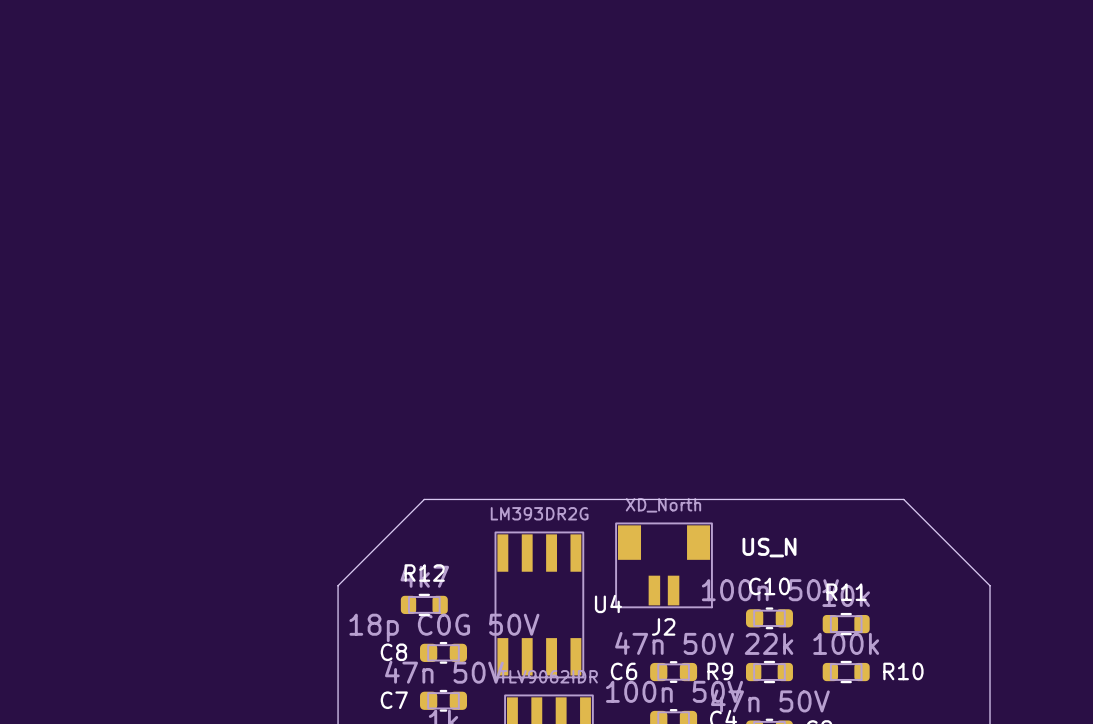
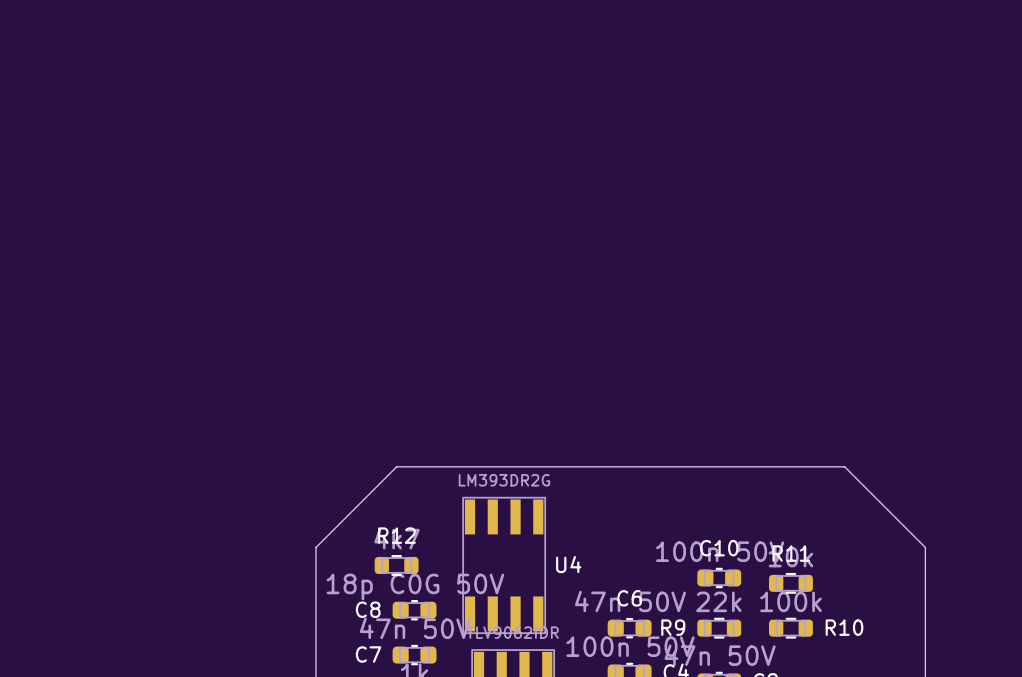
text: US_N (769, 547) -> none
J2: XD_North (664, 565) -> none
C6 name position: C6 (624, 671) -> C6 (629, 598)

